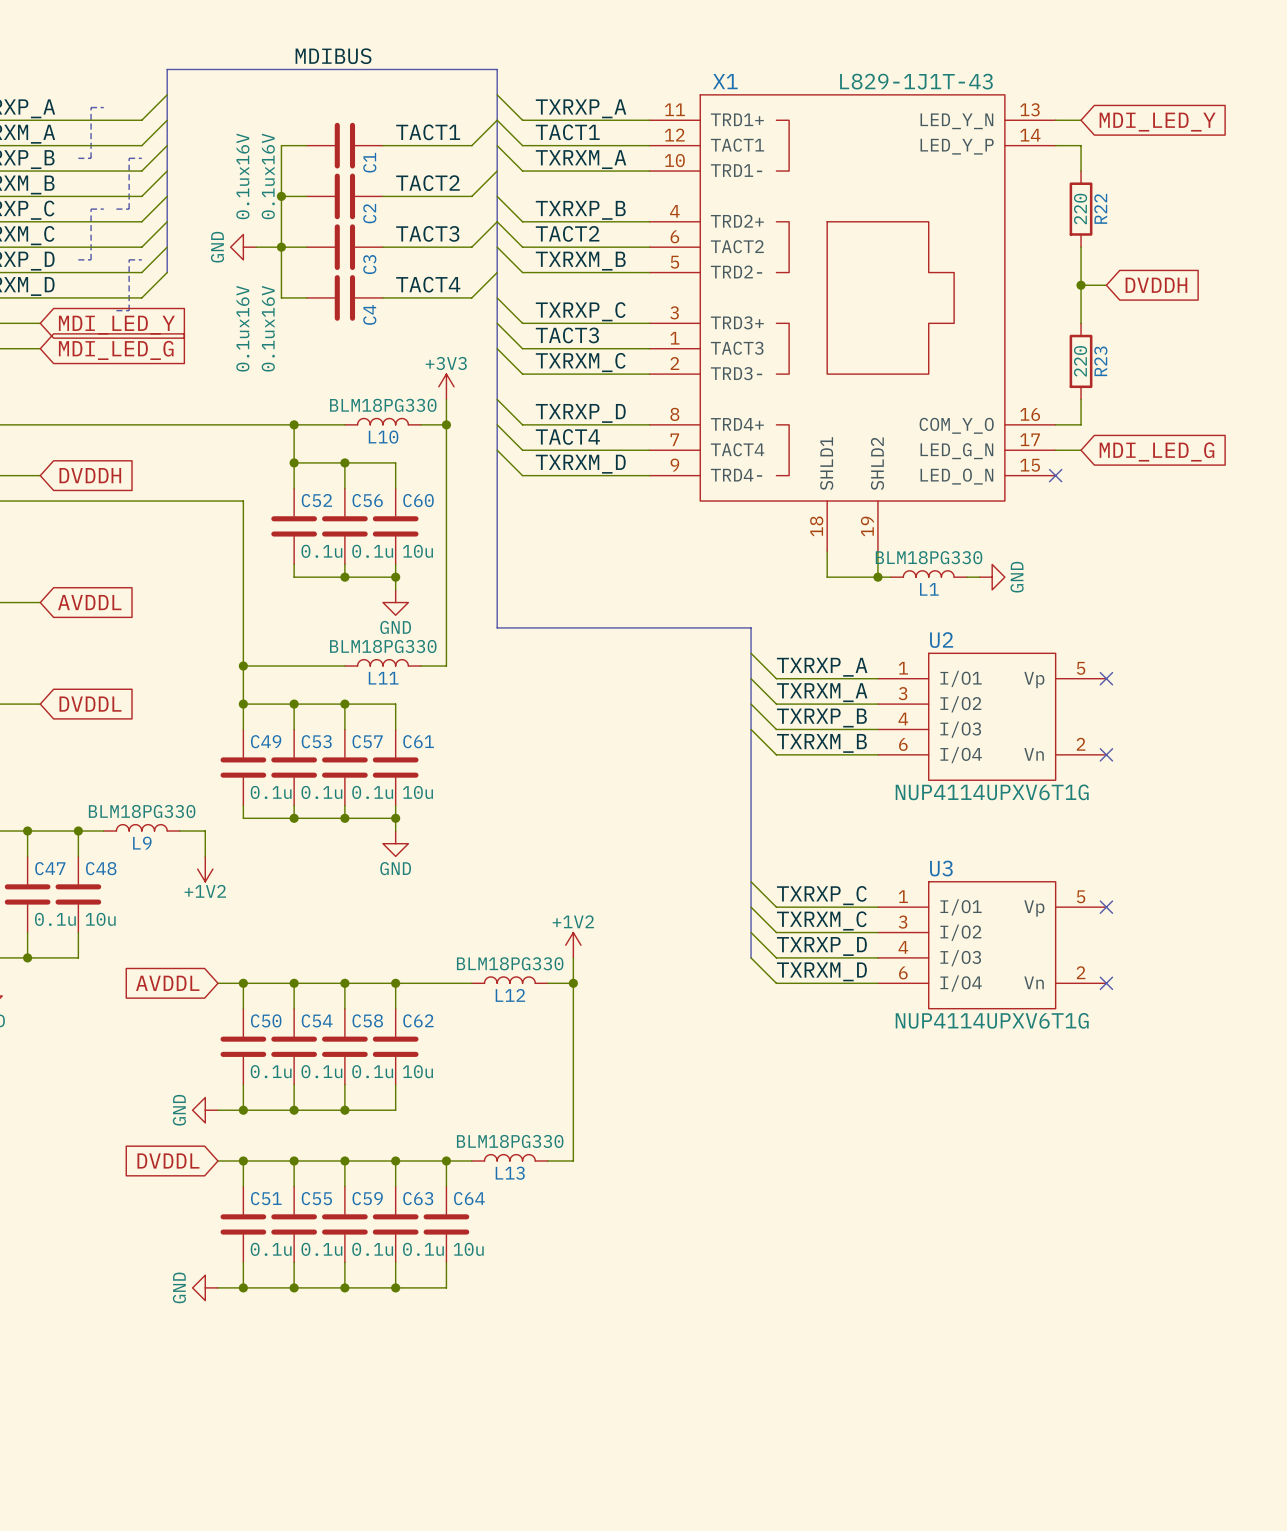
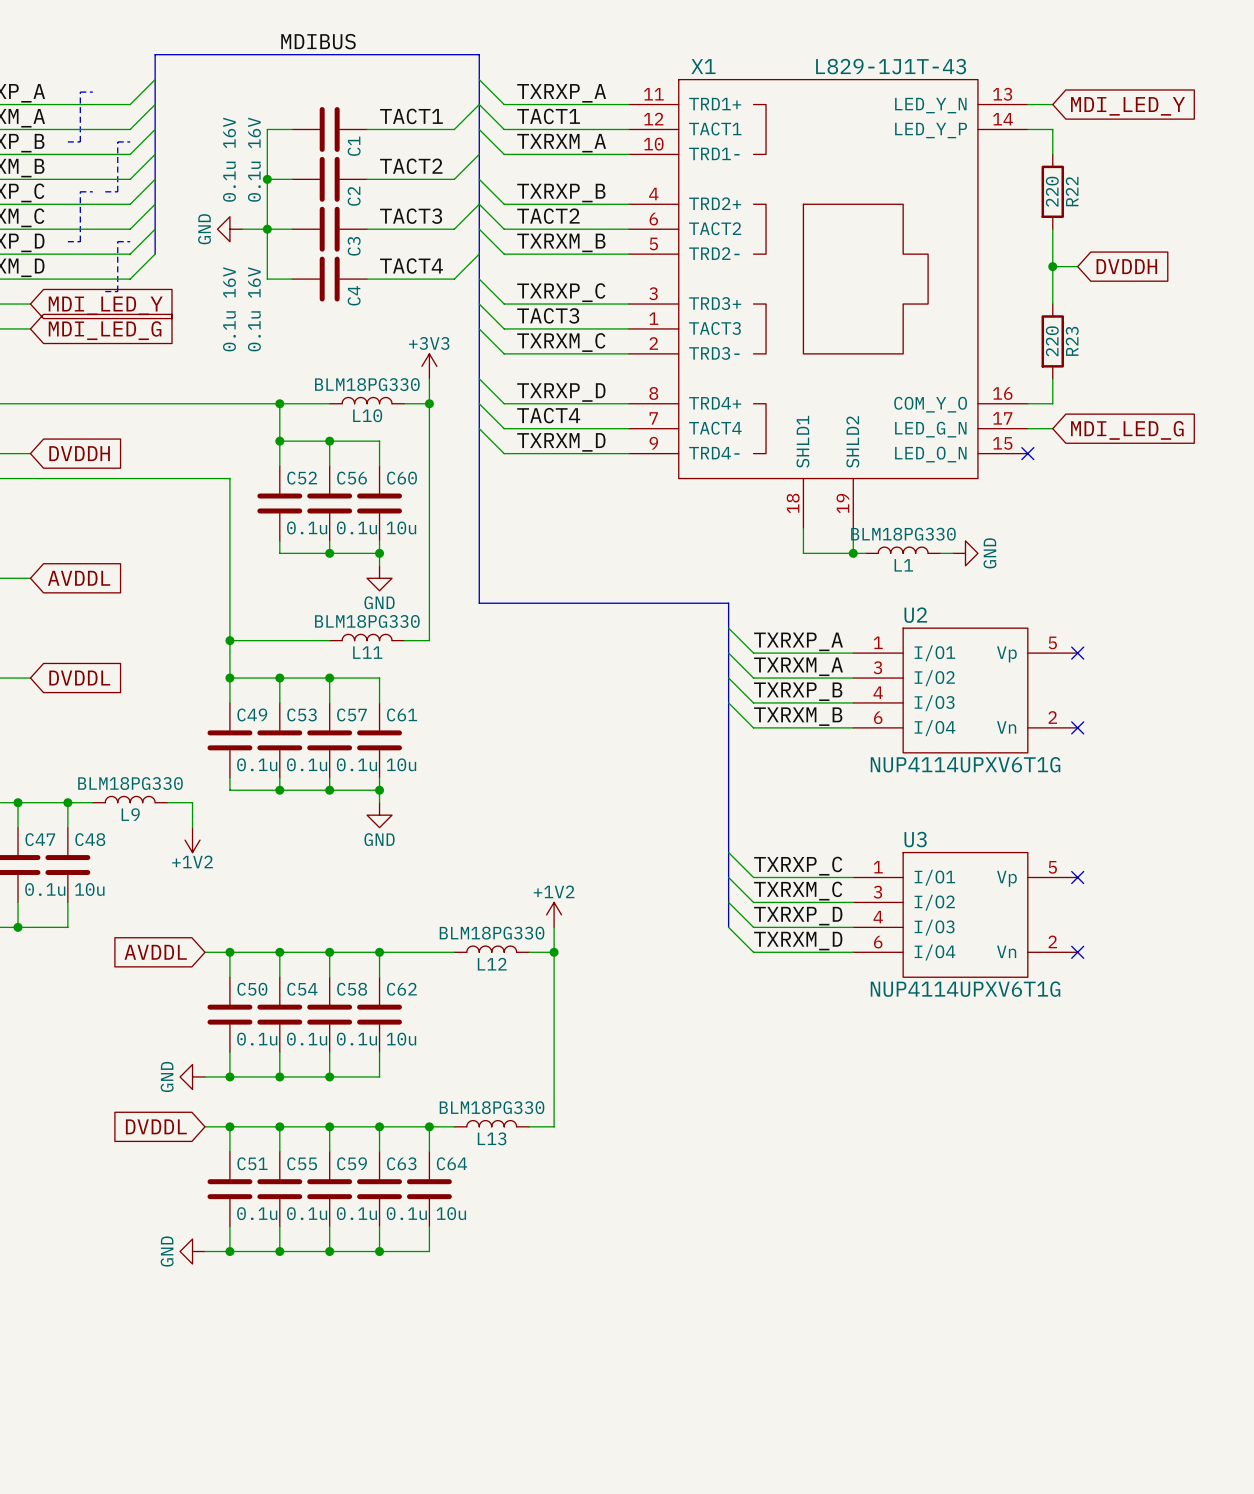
C2 value: 0.1ux16V (242, 176) -> 0.1u 16V (229, 159)
C1 value: 0.1ux16V (268, 176) -> 0.1u 16V (254, 159)
C4 value: 0.1ux16V (242, 328) -> 0.1u 16V (229, 309)
C3 value: 0.1ux16V (268, 328) -> 0.1u 16V (254, 309)

